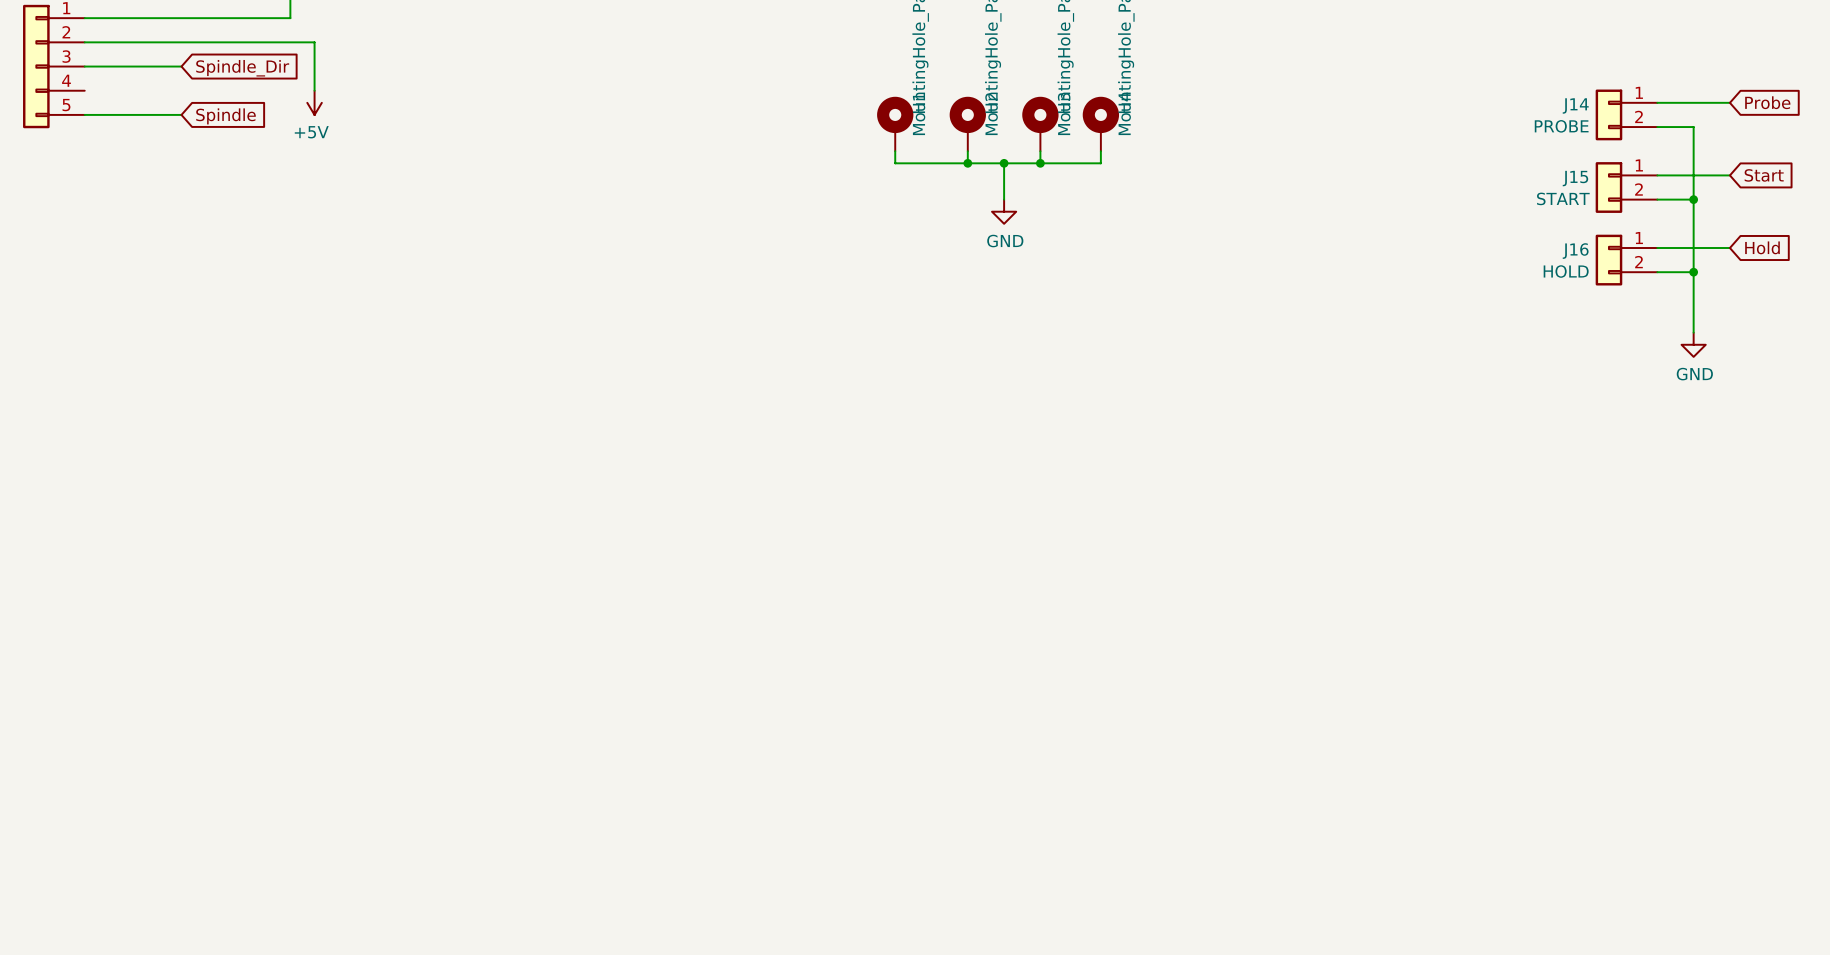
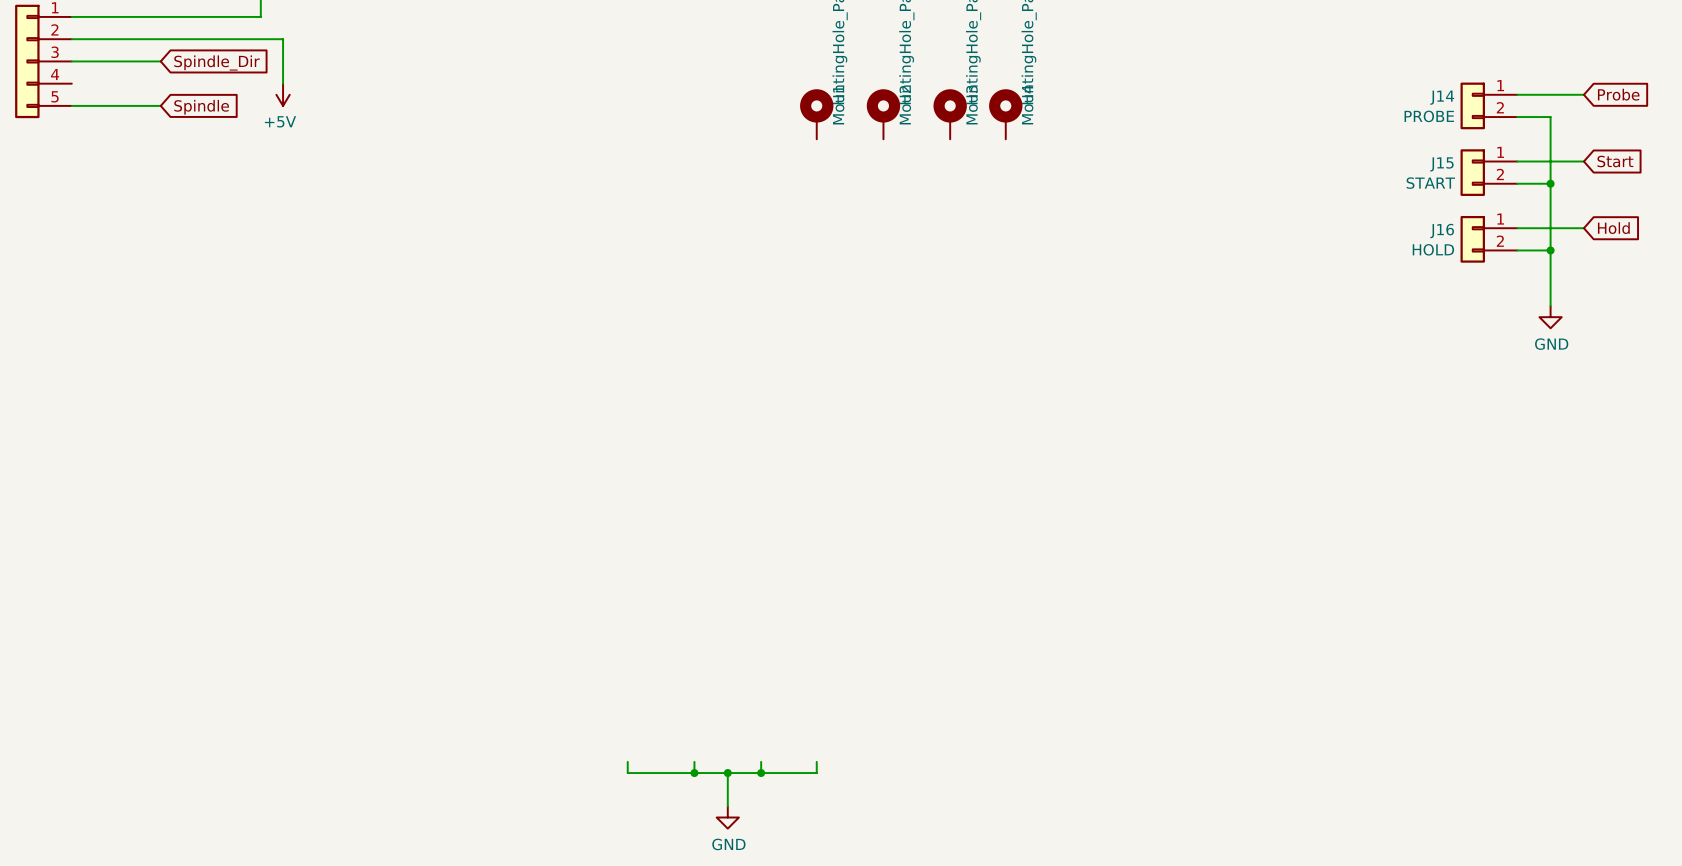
wire: (895, 151) (895, 163) (1100, 163) (1100, 151) -> none
wire: (967, 151) (967, 163) -> none
wire: (1040, 151) (1040, 163) -> none
junction: (967, 163) -> none
wire: (1004, 163) (1004, 199) -> none
junction: (1004, 163) -> none
junction: (1040, 163) -> none
power symbol: GND (1004, 211) -> none
wire: none -> (627, 761) (627, 773) (816, 773) (816, 761)
wire: none -> (694, 761) (694, 773)
wire: none -> (761, 761) (761, 773)
junction: none -> (694, 773)
wire: none -> (727, 773) (727, 806)
junction: none -> (727, 773)
junction: none -> (761, 773)
power symbol: none -> GND (727, 817)

